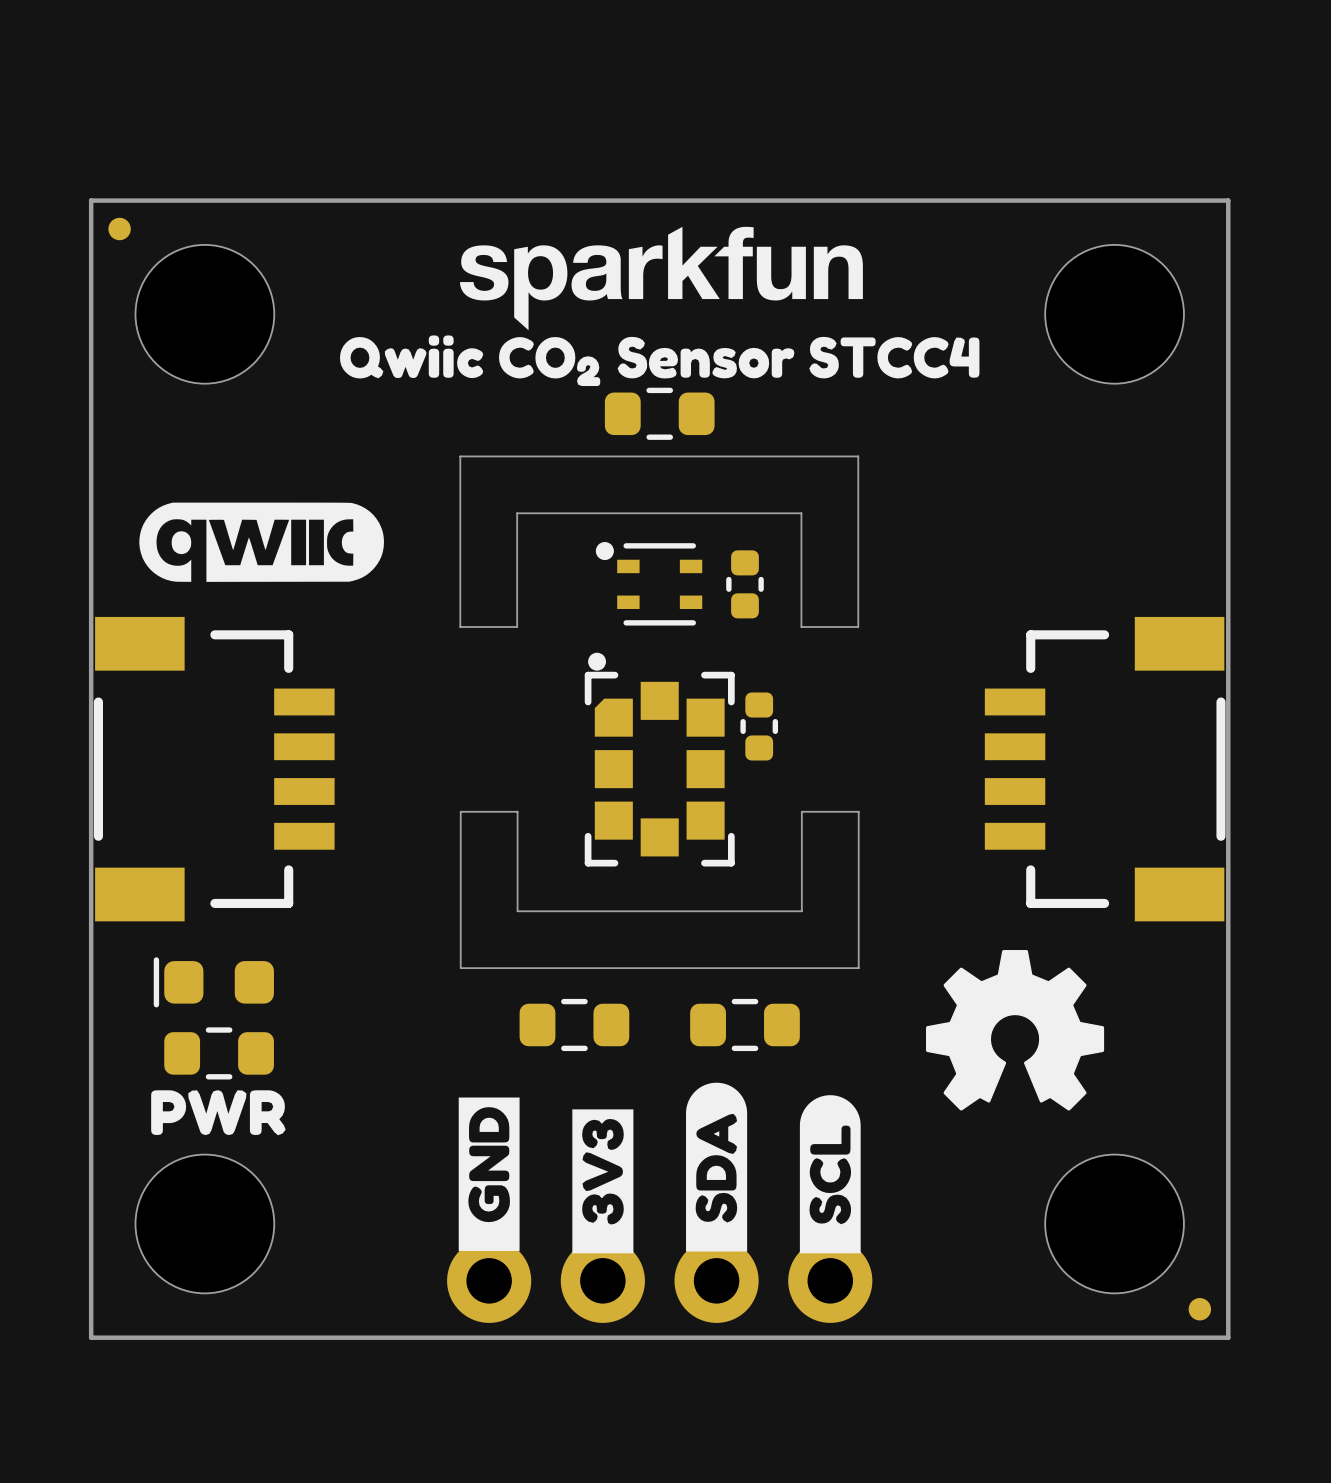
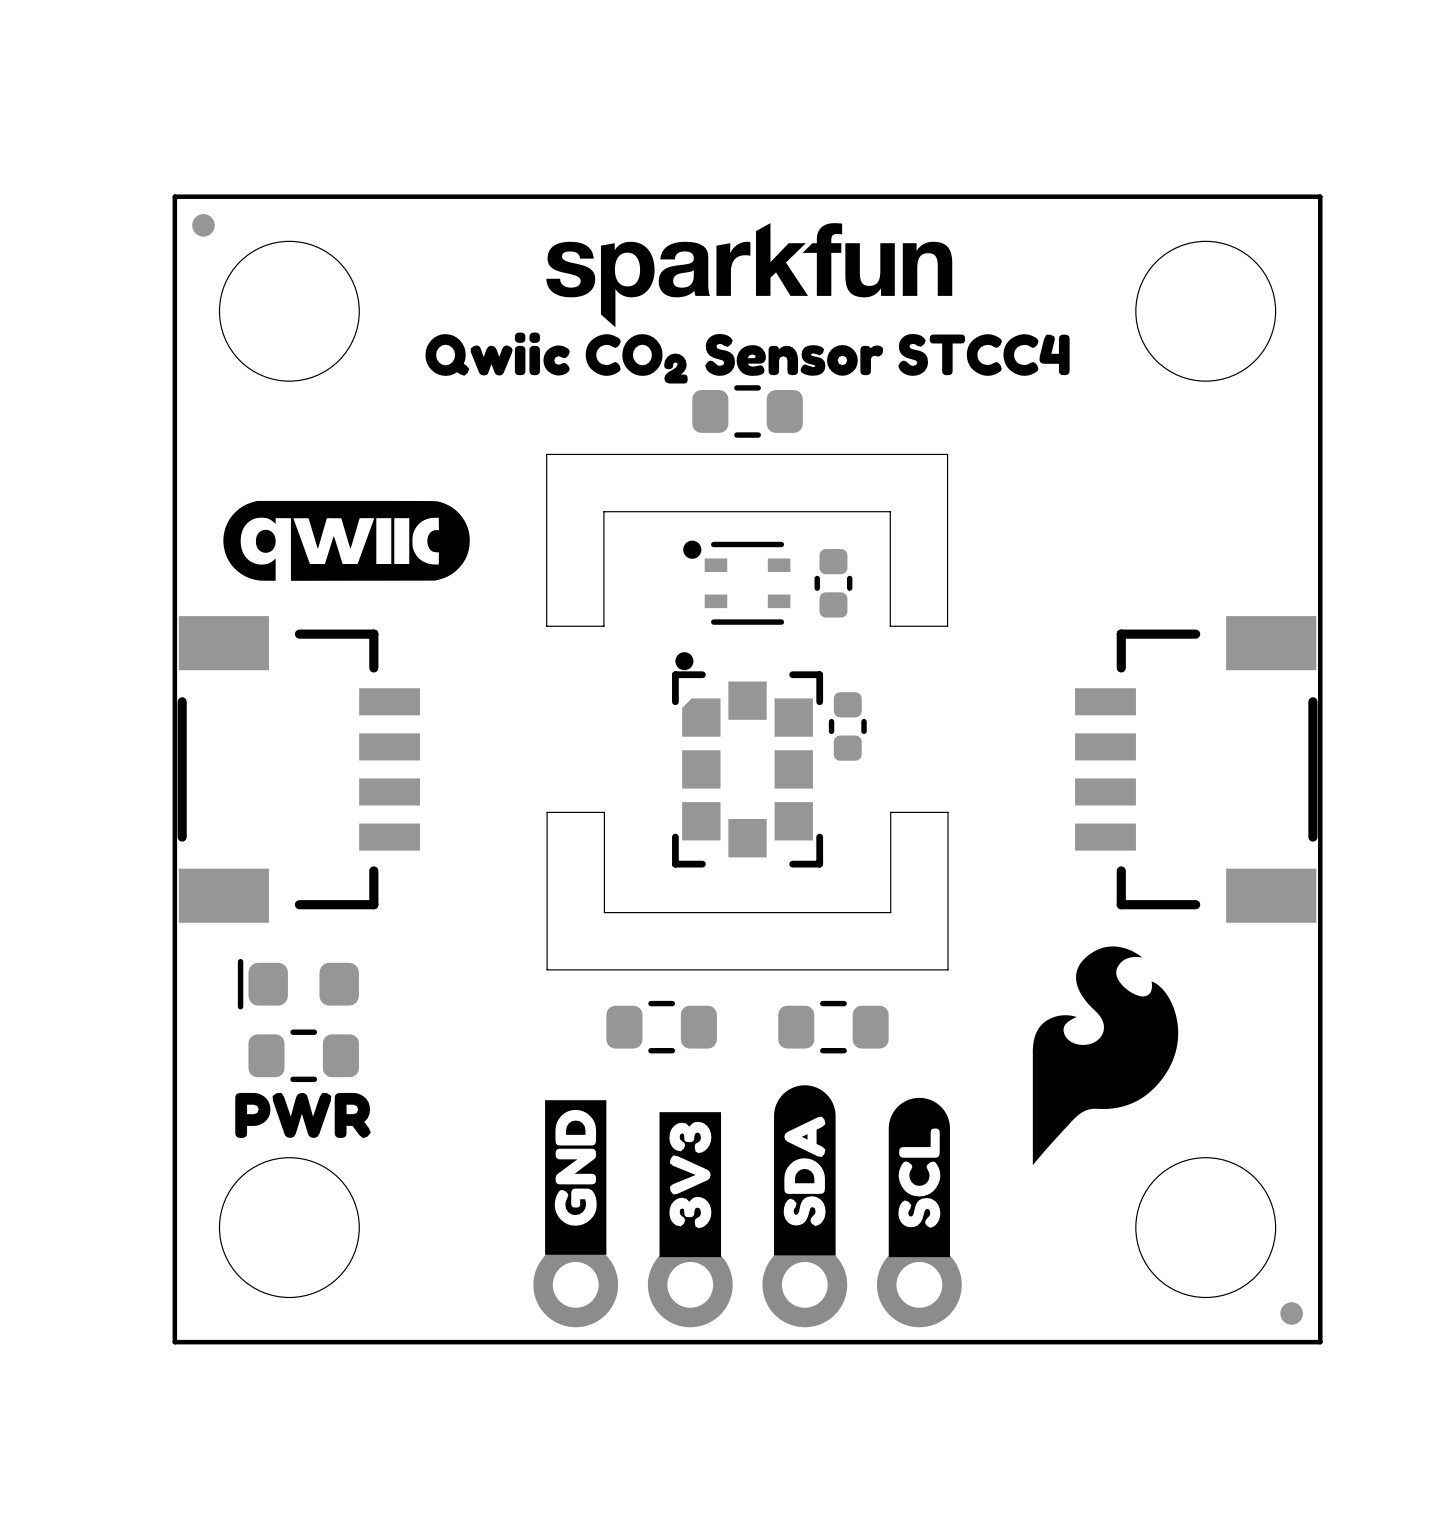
drawing shape: [926, 950, 1105, 1111] -> [1032, 946, 1179, 1166]

